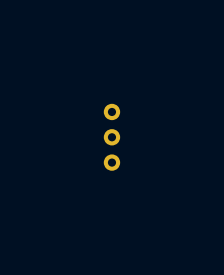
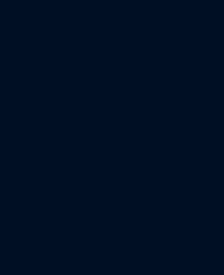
part: (111, 137) -> none

